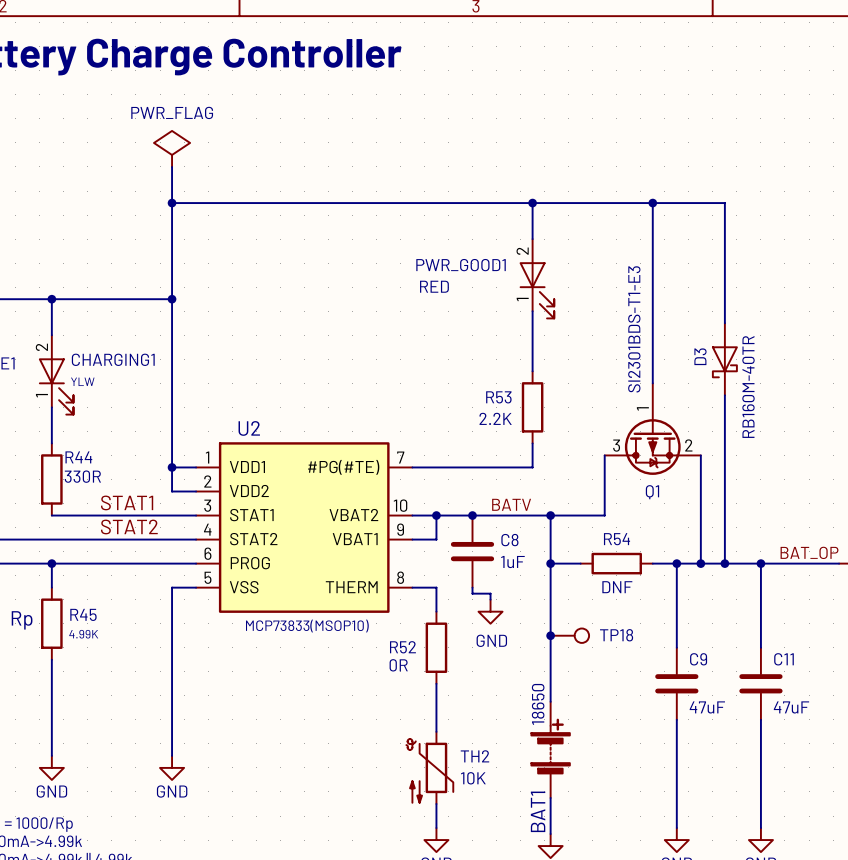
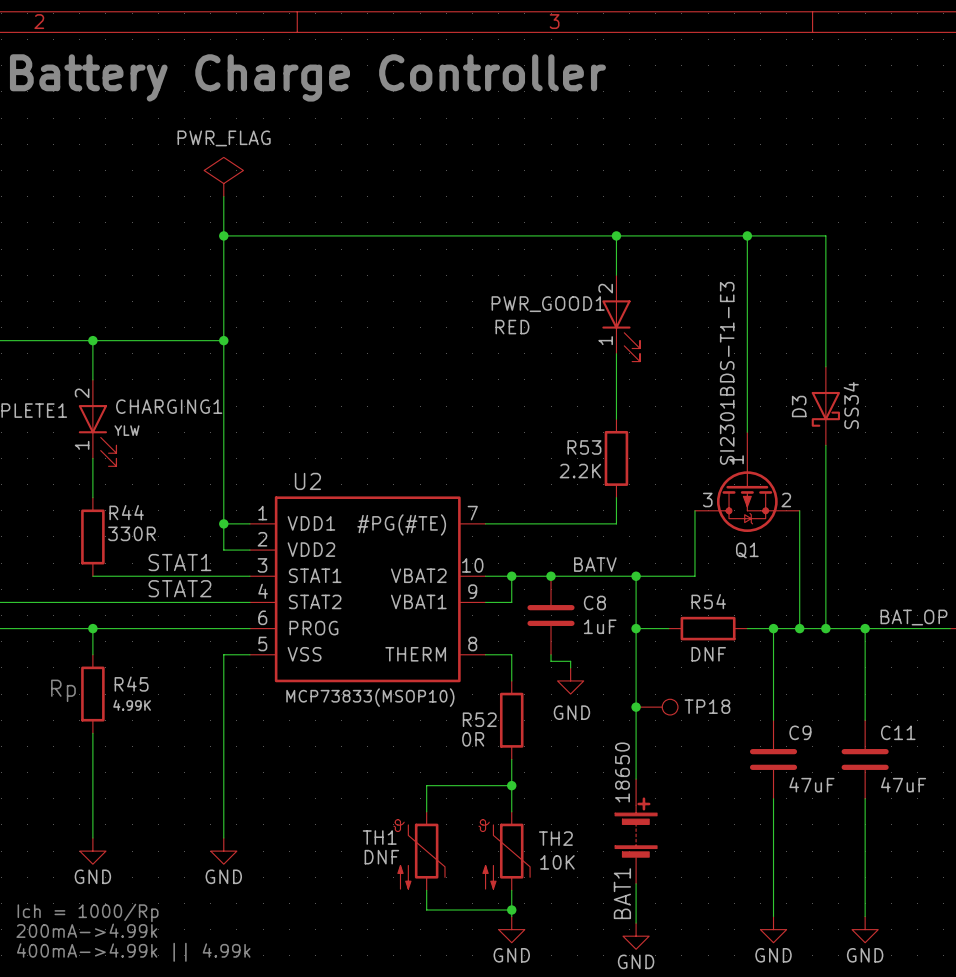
D3 value: RB160M-40TR (748, 387) -> SS34 (851, 405)
wire: none -> (511, 785) (426, 785) (426, 811)
junction: none -> (511, 785)
TH1: none -> DNF (419, 851)
wire: none -> (426, 890) (426, 910) (511, 910)
junction: none -> (511, 910)

